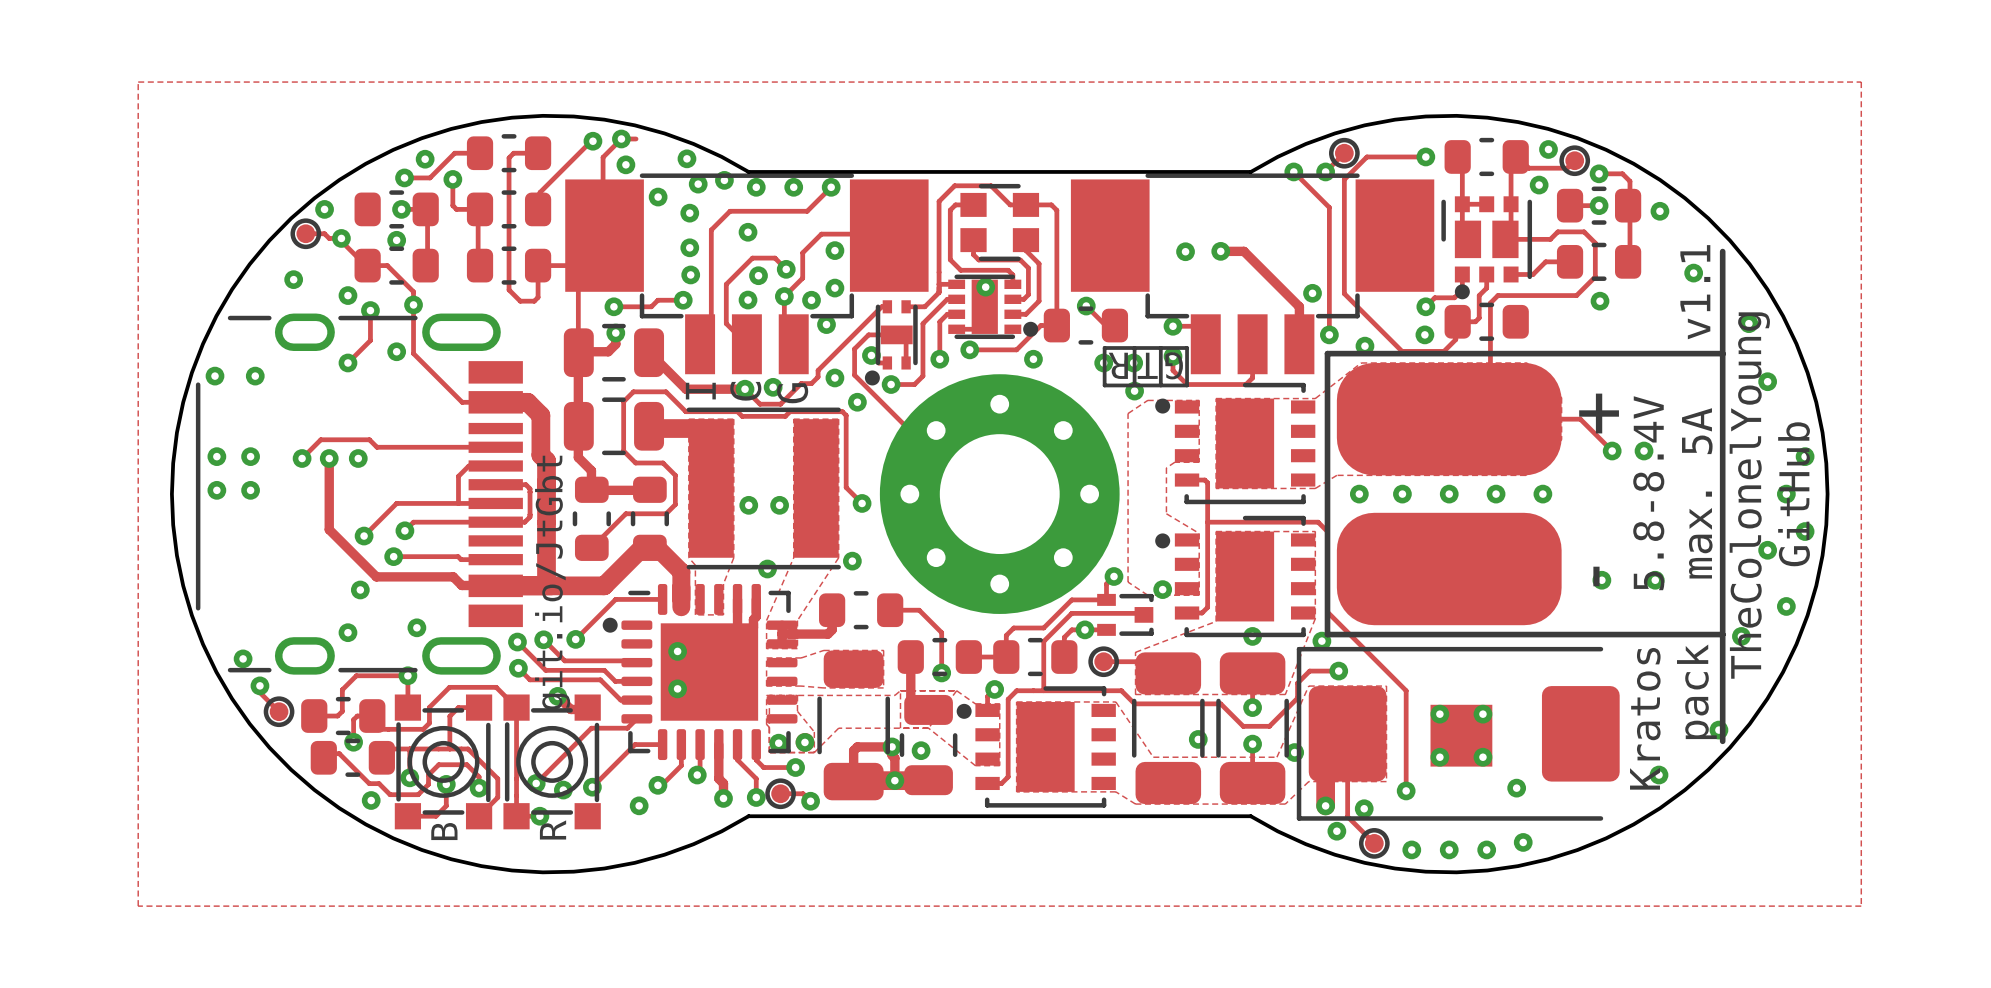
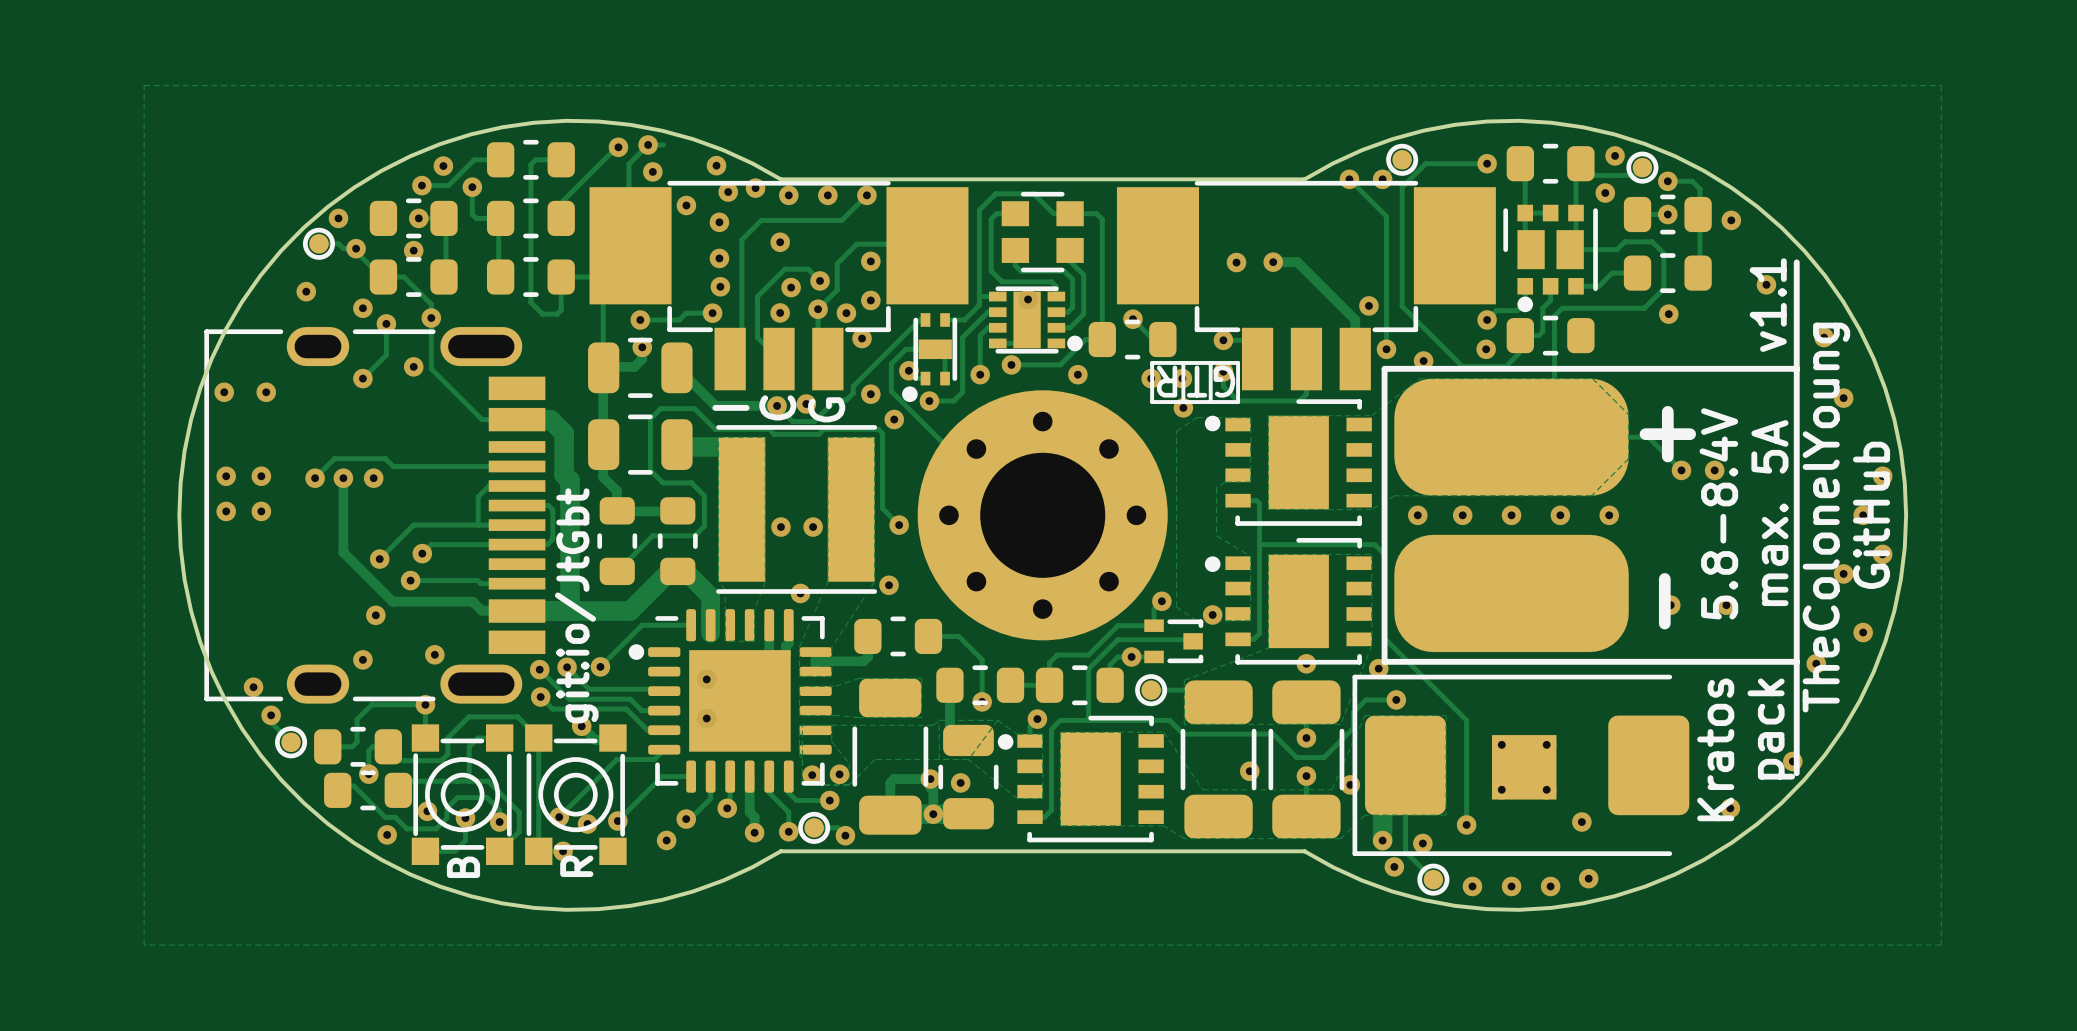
part footprint: [195, 313, 523, 675] -> [204, 327, 546, 704]

